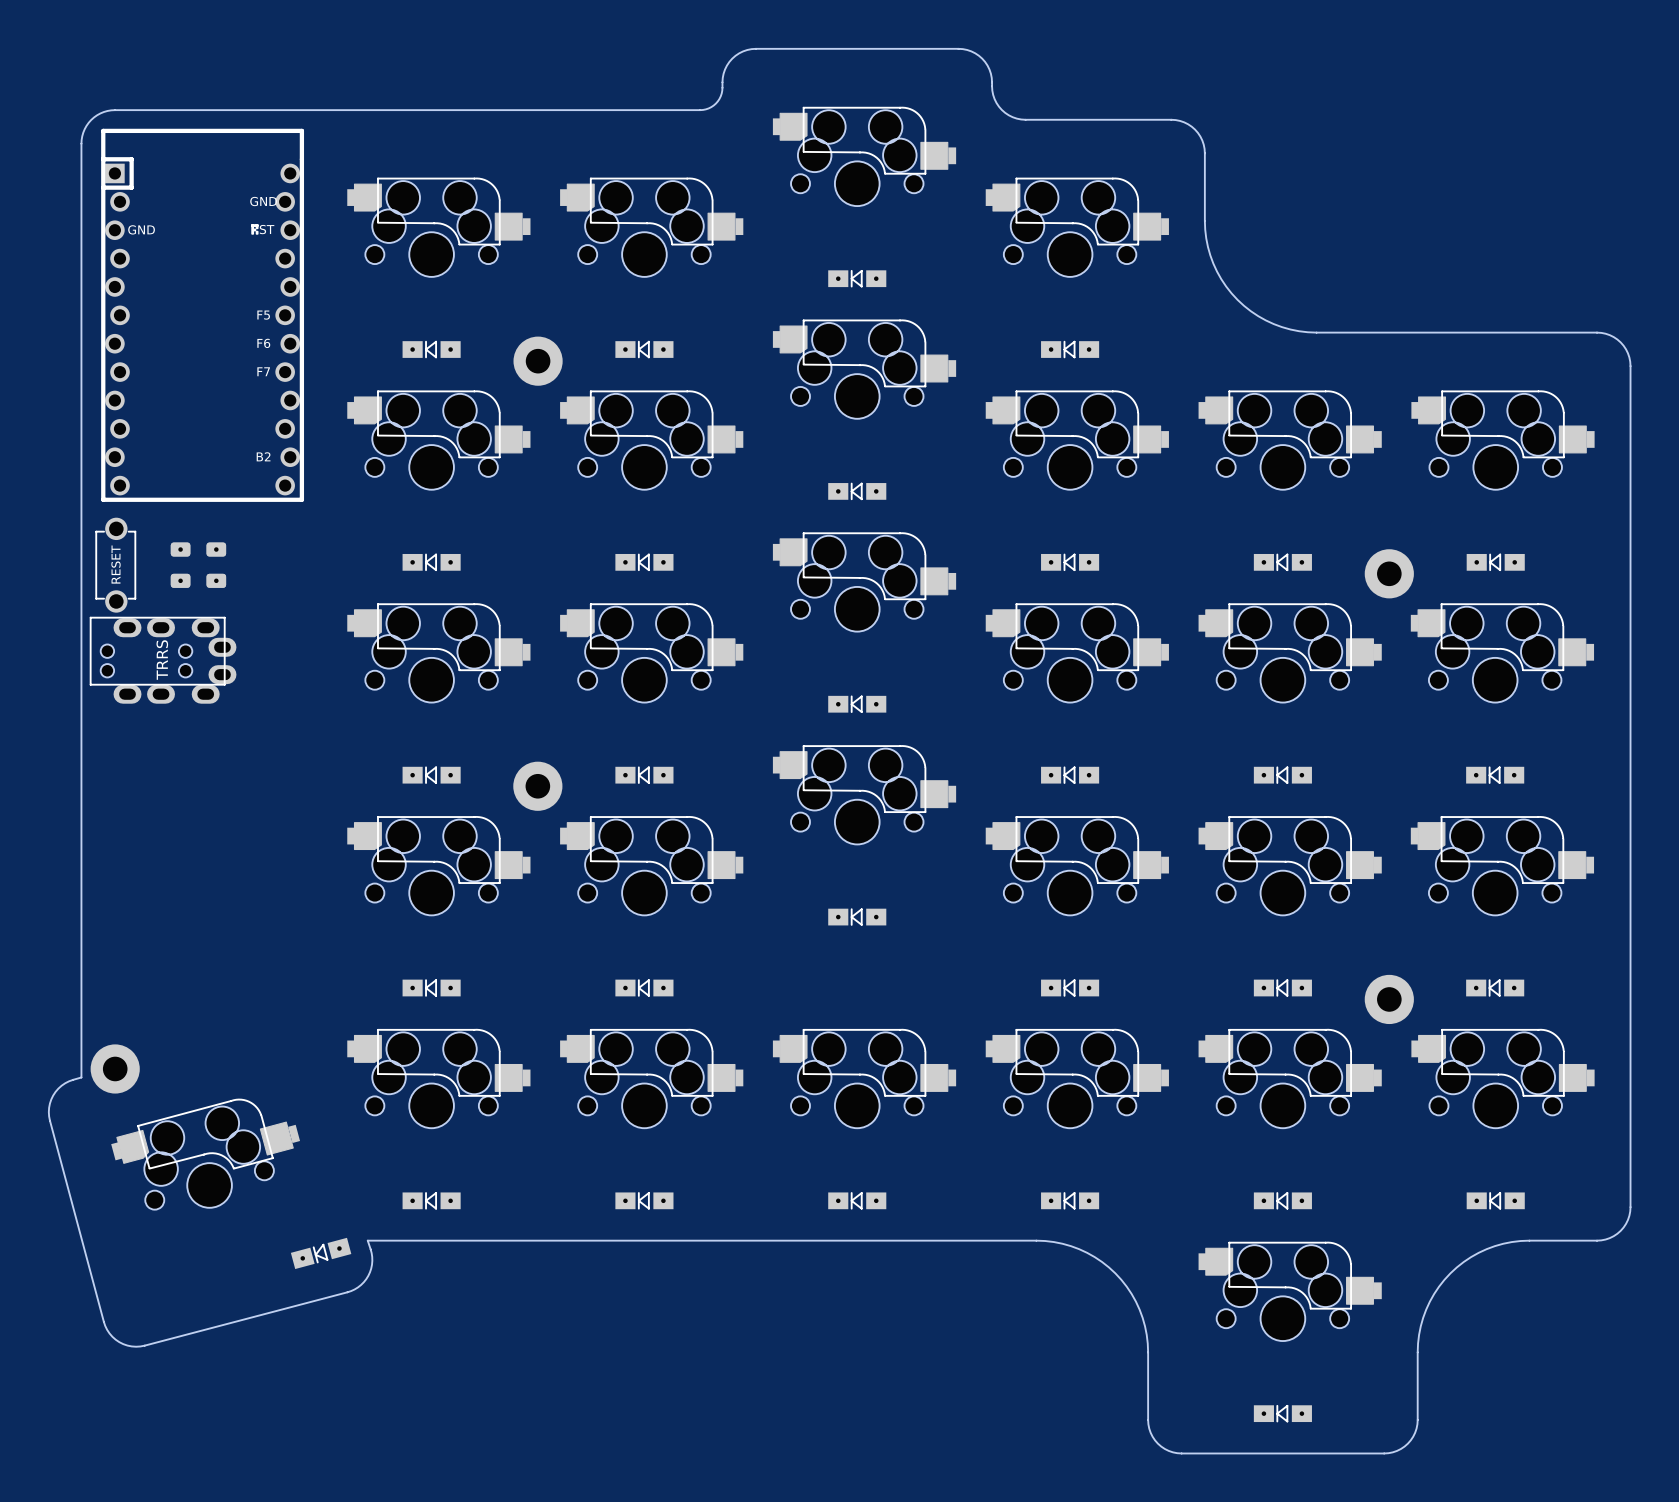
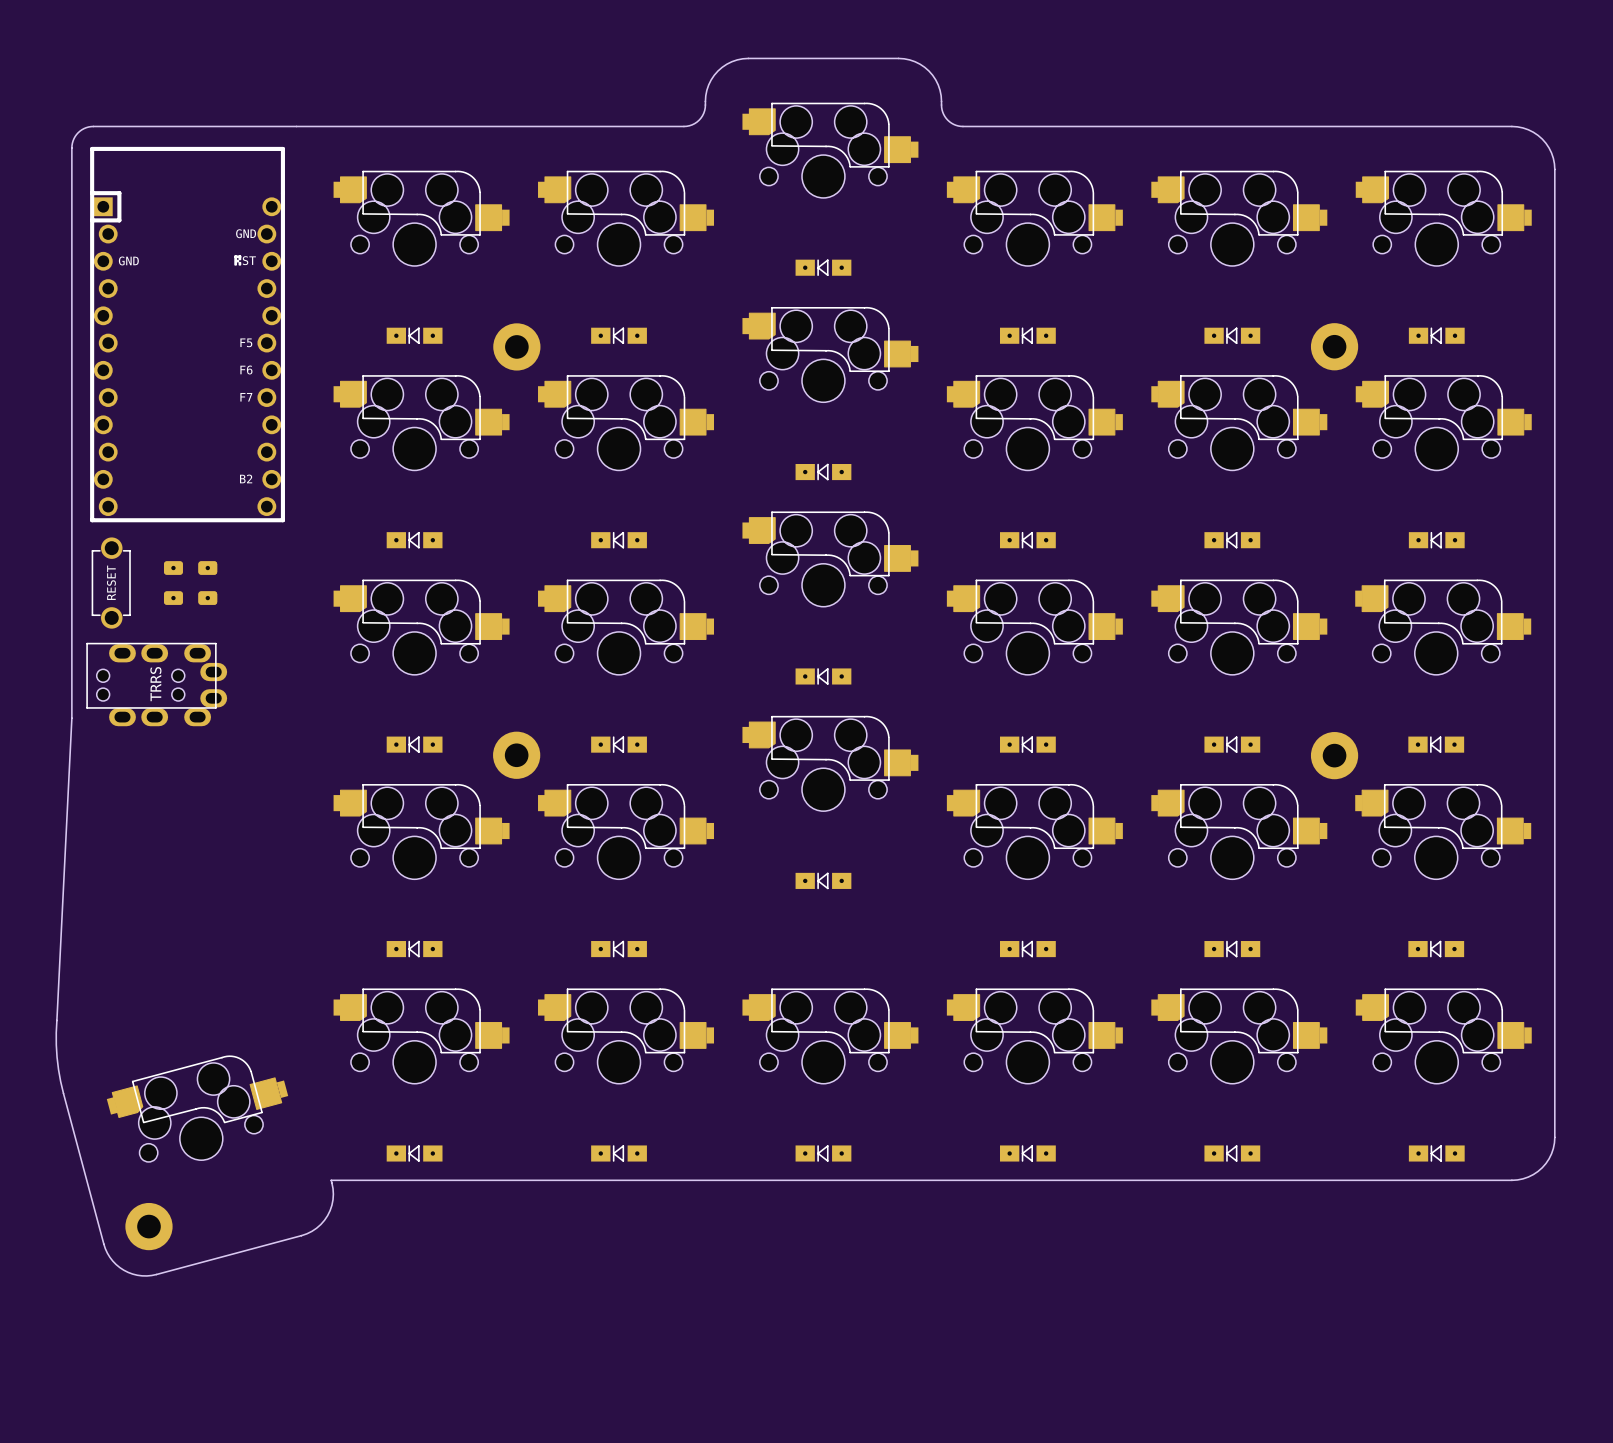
board edge: (755, 48) (962, 49) (975, 53) (985, 61) (990, 73) (992, 90) (996, 103) (1005, 112) (1016, 118) (1171, 119) (1188, 124) (1197, 132) (1204, 148) (1205, 229) (1207, 246) (1217, 271) (1231, 293) (1244, 305) (1258, 316) (1282, 327) (1316, 332) (1601, 332) (1617, 339) (1627, 353) (1630, 366) (1629, 1215) (1620, 1230) (1605, 1239) (1520, 1241) (1503, 1243) (1478, 1252) (1450, 1273) (1434, 1294) (1423, 1317) (1418, 1343) (1417, 1424) (1410, 1440) (1397, 1450) (1384, 1453) (1181, 1453) (1164, 1448) (1155, 1440) (1149, 1428) (1146, 1334) (1142, 1317) (1131, 1294) (1115, 1273) (1094, 1257) (1070, 1246) (1045, 1241) (367, 1240) (372, 1256) (369, 1272) (361, 1285) (347, 1292) (140, 1346) (127, 1345) (119, 1342) (109, 1333) (105, 1325) (48, 1112) (51, 1099) (58, 1088) (69, 1081) (81, 1077) (81, 143) (84, 129) (97, 115) (114, 110) (703, 109) (711, 107) (719, 98) (723, 73) (729, 61) (743, 51) (755, 48) -> (748, 58) (731, 61) (717, 71) (708, 84) (702, 115) (694, 123) (686, 126) (93, 126) (81, 129) (74, 138) (71, 147) (71, 718) (56, 1045) (63, 1093) (103, 1244) (109, 1257) (119, 1267) (128, 1272) (142, 1275) (151, 1275) (306, 1233) (320, 1224) (330, 1210) (333, 1194) (331, 1180) (1511, 1180) (1523, 1178) (1538, 1171) (1551, 1153) (1554, 1137) (1554, 169) (1551, 152) (1545, 143) (1533, 132) (1511, 126) (960, 126) (949, 121) (943, 114) (940, 90) (932, 75) (920, 64) (909, 59) (748, 58)
part: none -> (1239, 218)
part: none -> (1443, 218)
part: (202, 315) -> none
part: none -> (187, 334)
part: none -> (1232, 335)
part: none -> (1436, 335)
part: none -> (1334, 346)
part position: (115, 565) -> (111, 583)
part: (180, 565) -> none
part: (216, 565) -> none
part: (1389, 573) -> none
part: none -> (173, 583)
part: none -> (207, 583)
part position: (163, 660) -> (156, 684)
part: none -> (1334, 755)
part: (1389, 999) -> none
part position: (115, 1068) -> (148, 1226)
part: (321, 1253) -> none
part: (1290, 1291) -> none
part: (1282, 1413) -> none

